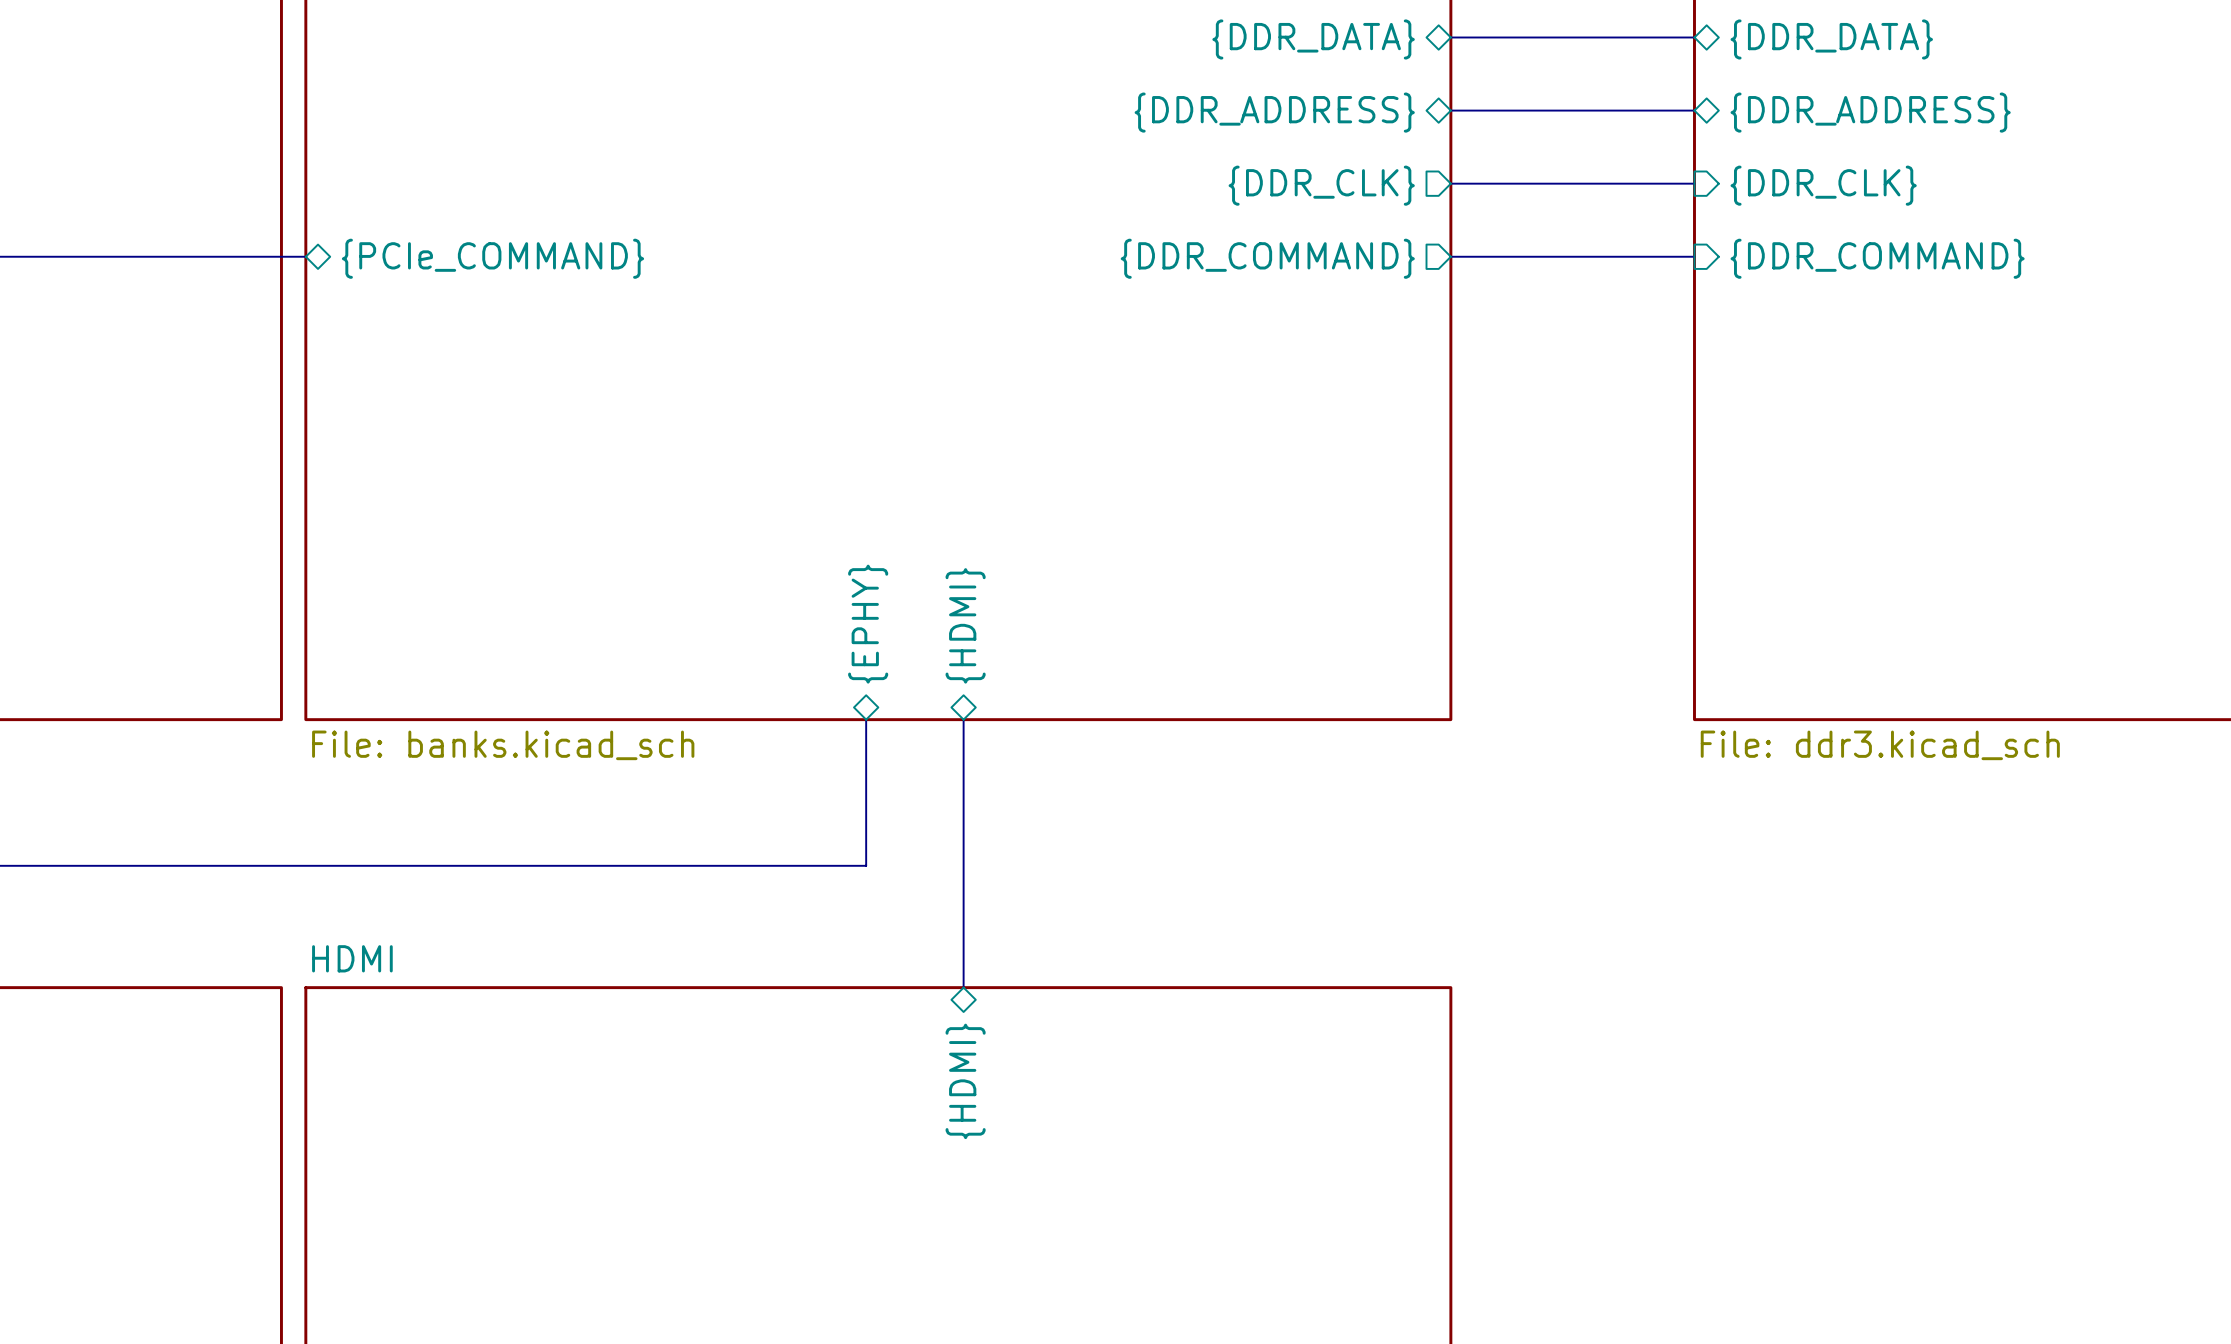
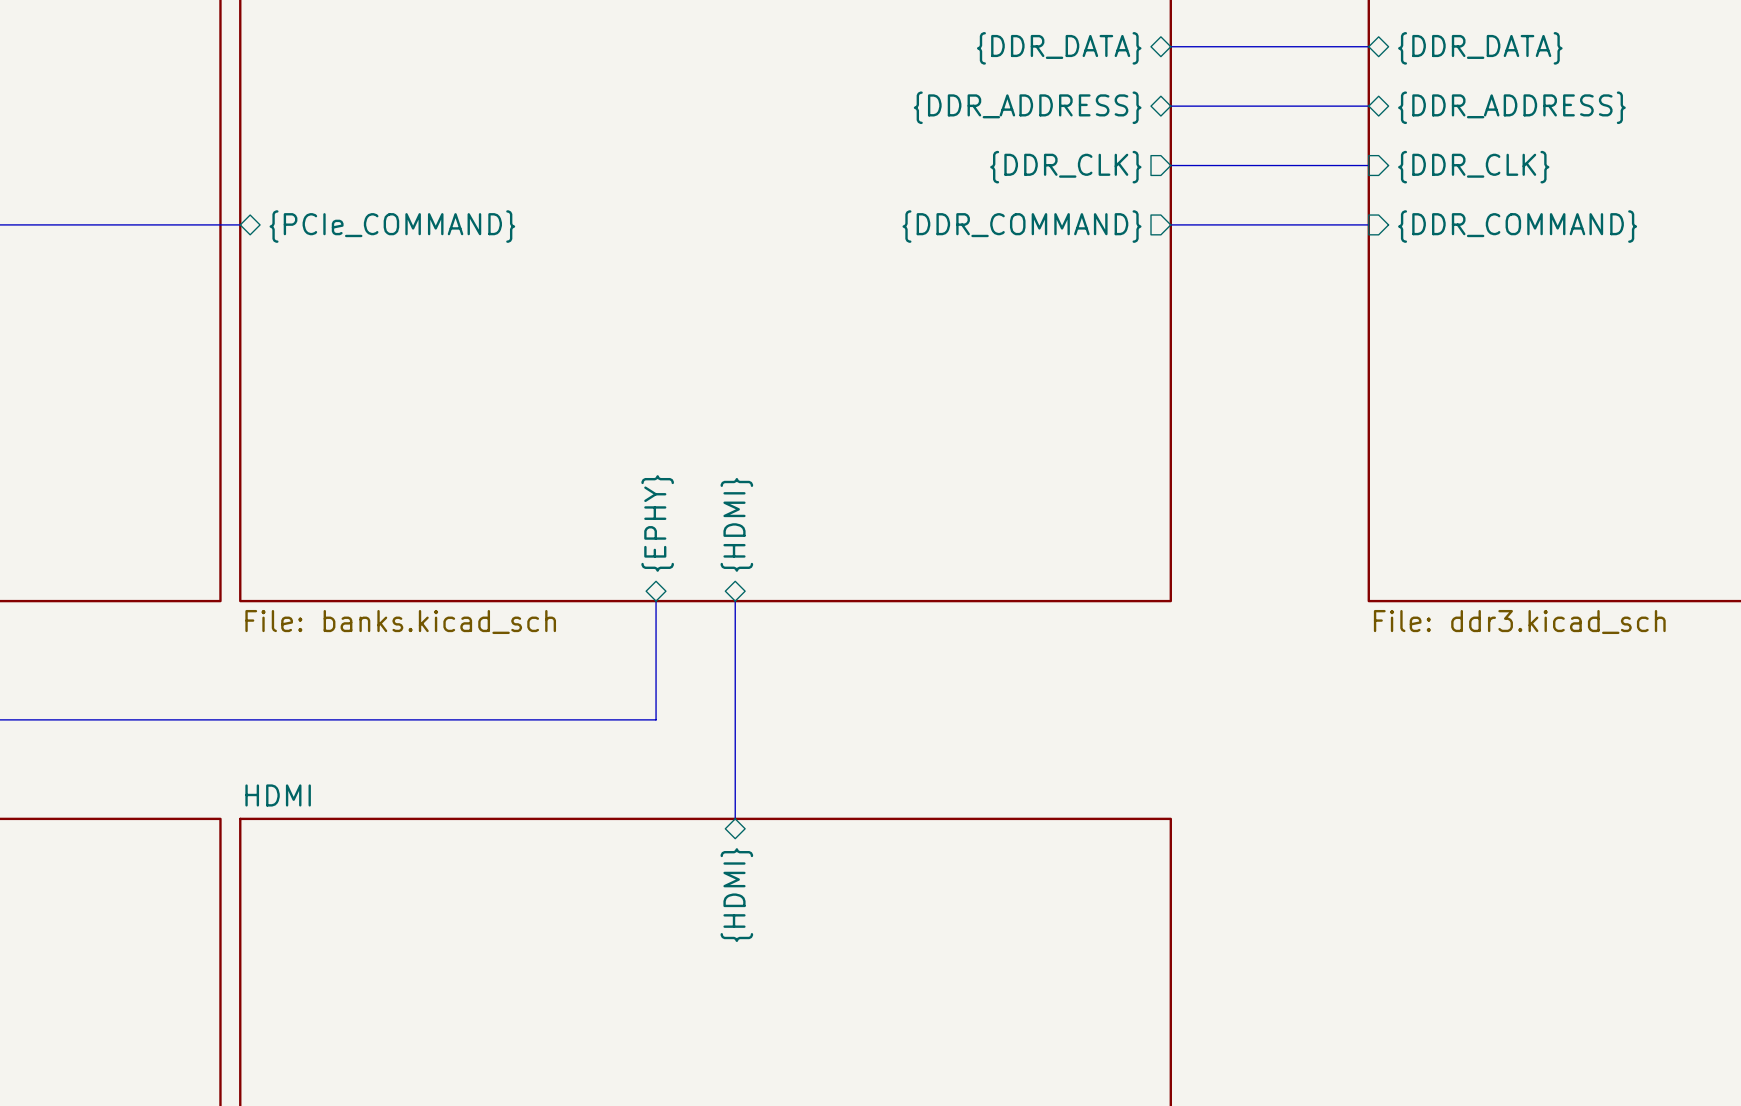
sheet pin position: {EPHY} (868, 624) -> {EPHY} (657, 523)
sheet pin position: {HDMI} (965, 625) -> {HDMI} (736, 524)
bus: (866, 719) (866, 865) (817, 865) -> (656, 601) (656, 719)
bus: (963, 719) (963, 987) -> (735, 601) (735, 818)
sheet pin position: {HDMI} (965, 1081) -> {HDMI} (736, 895)

